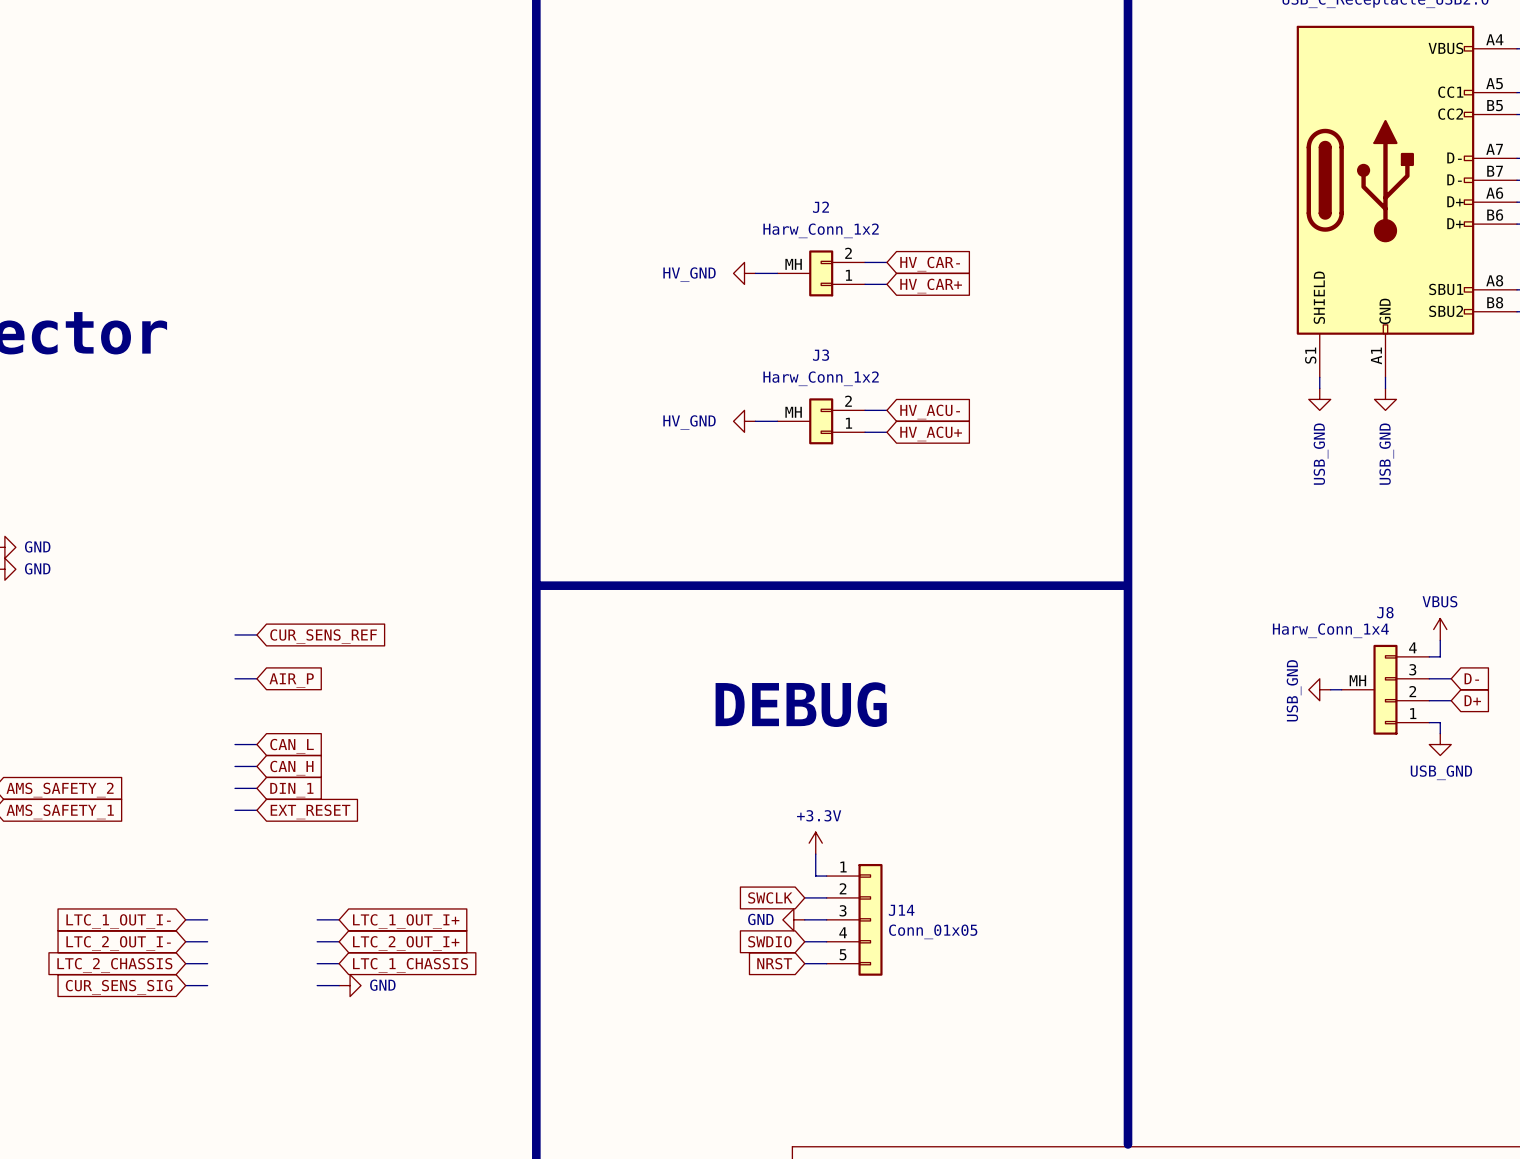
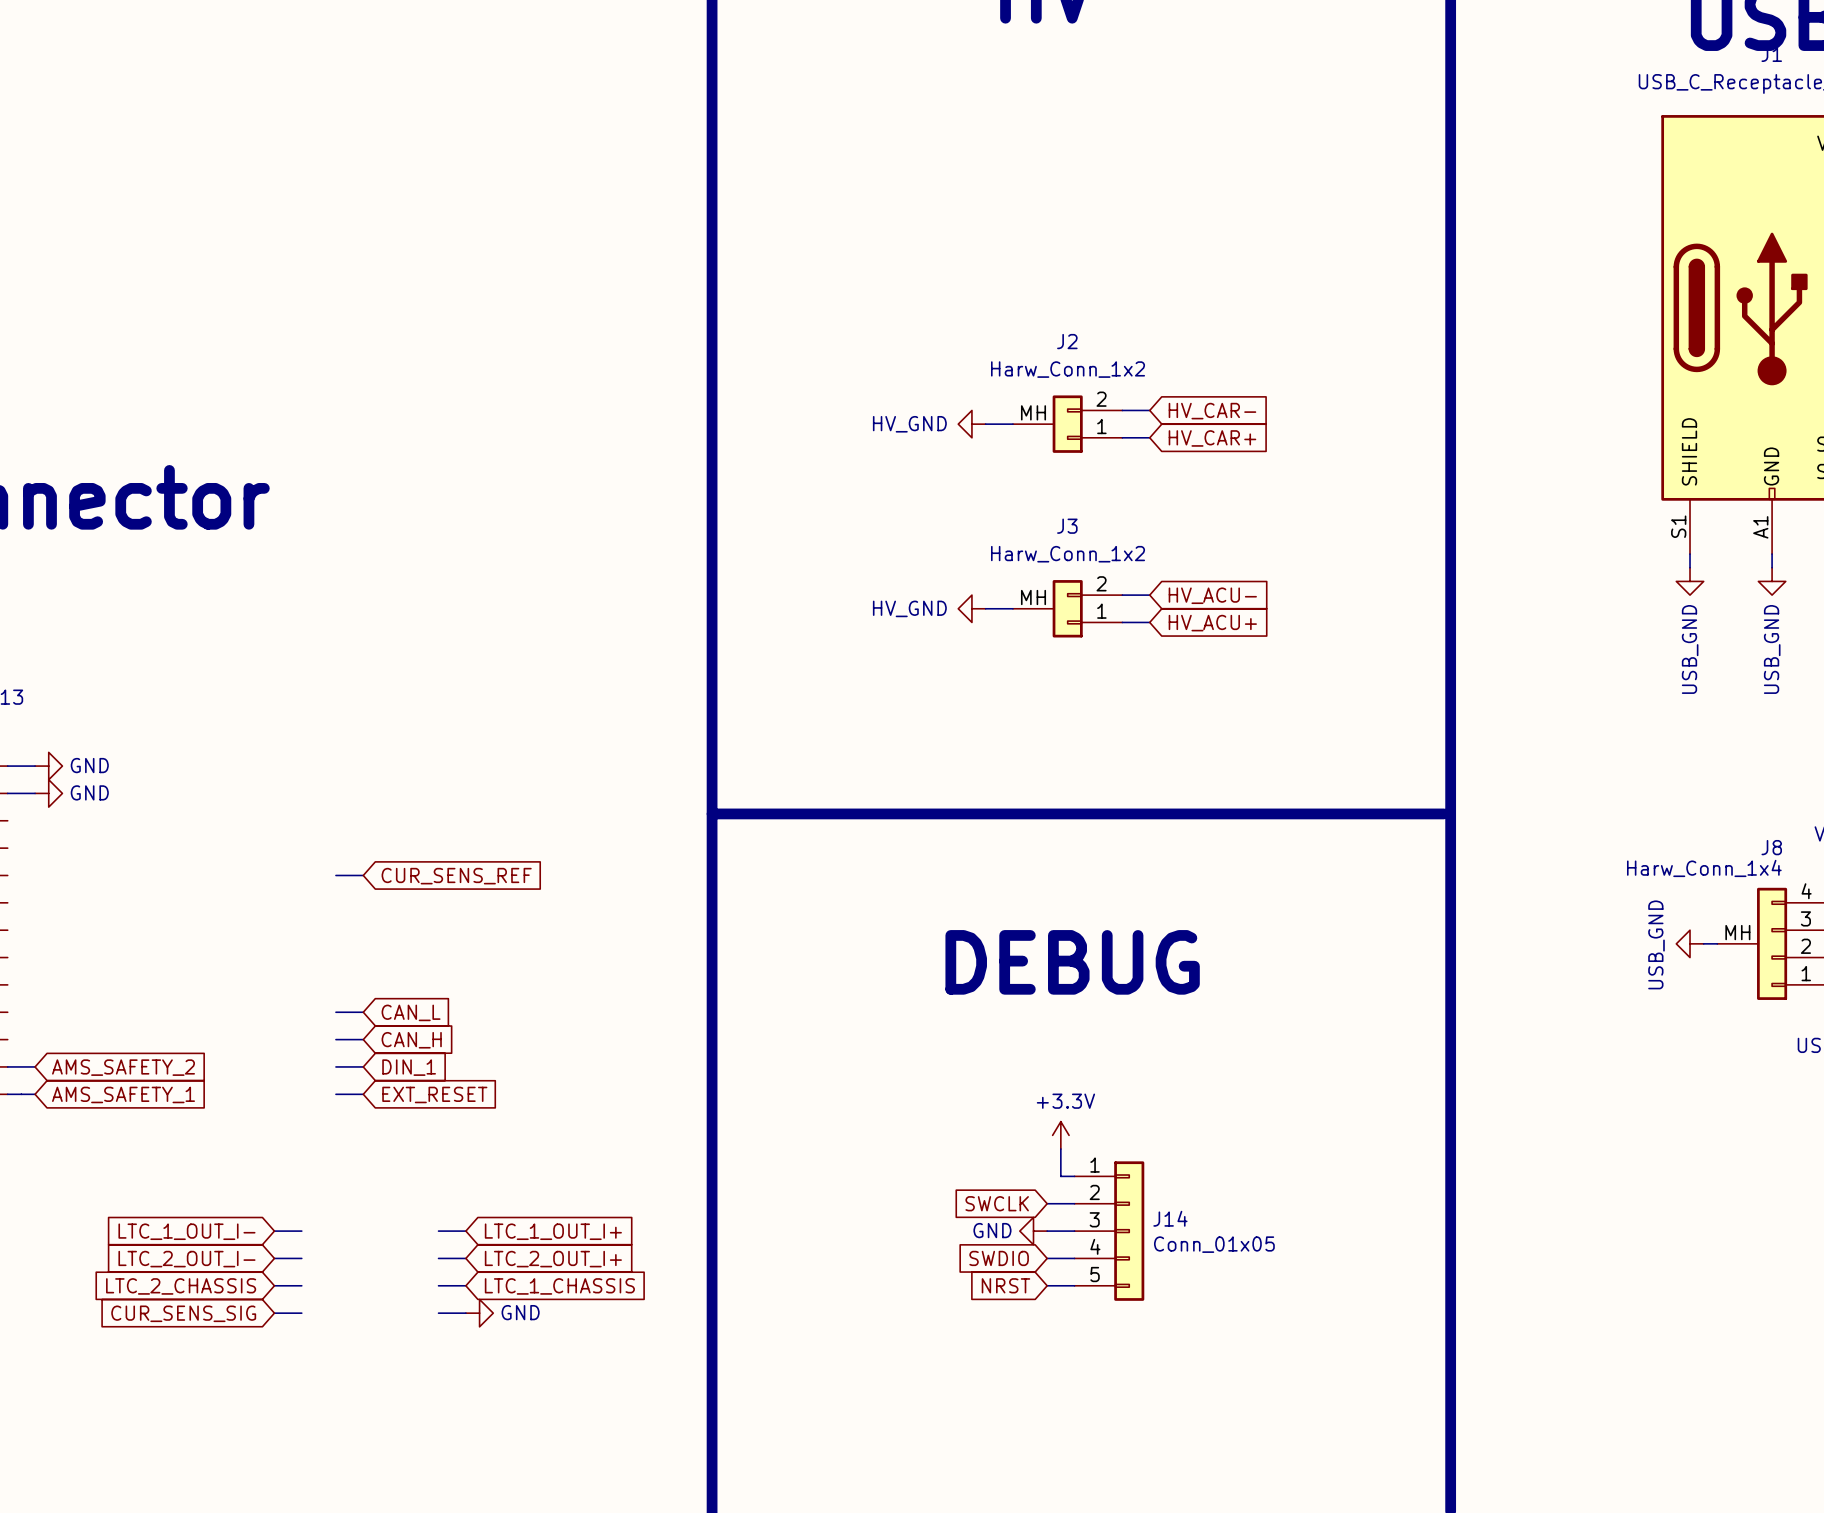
wire: (235, 678) (256, 678) -> none
global label: AIR_P (291, 680) -> none

